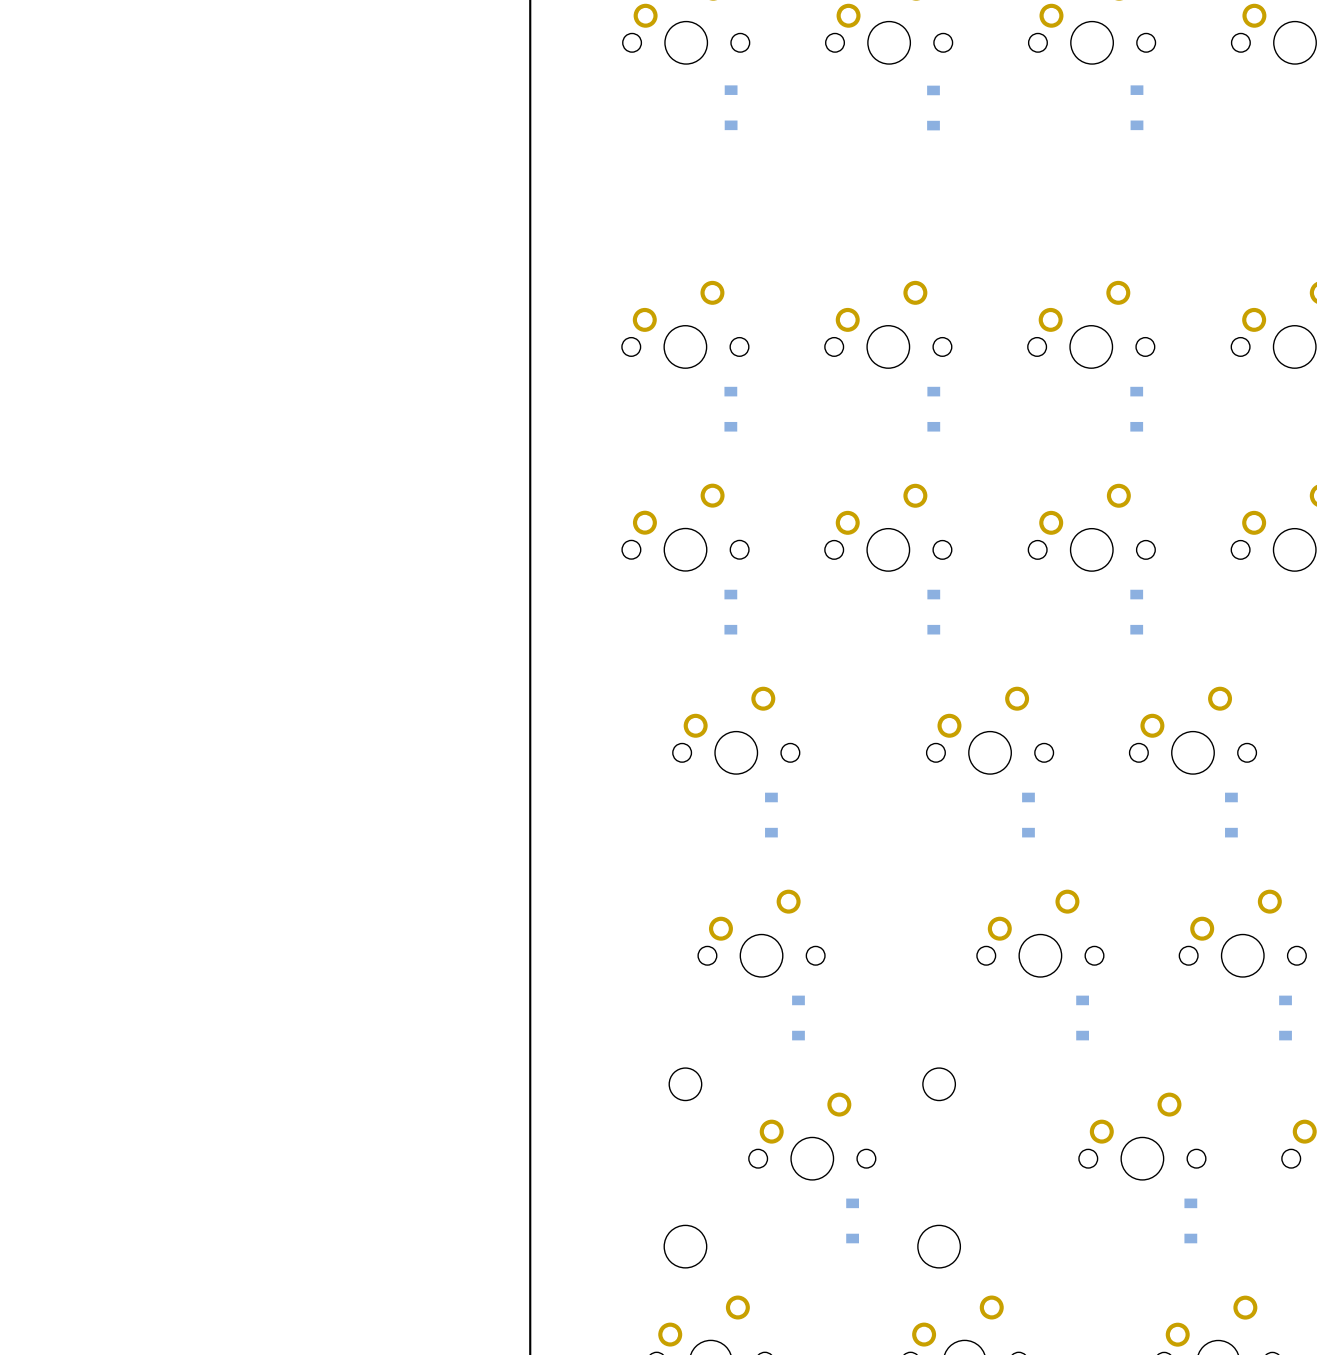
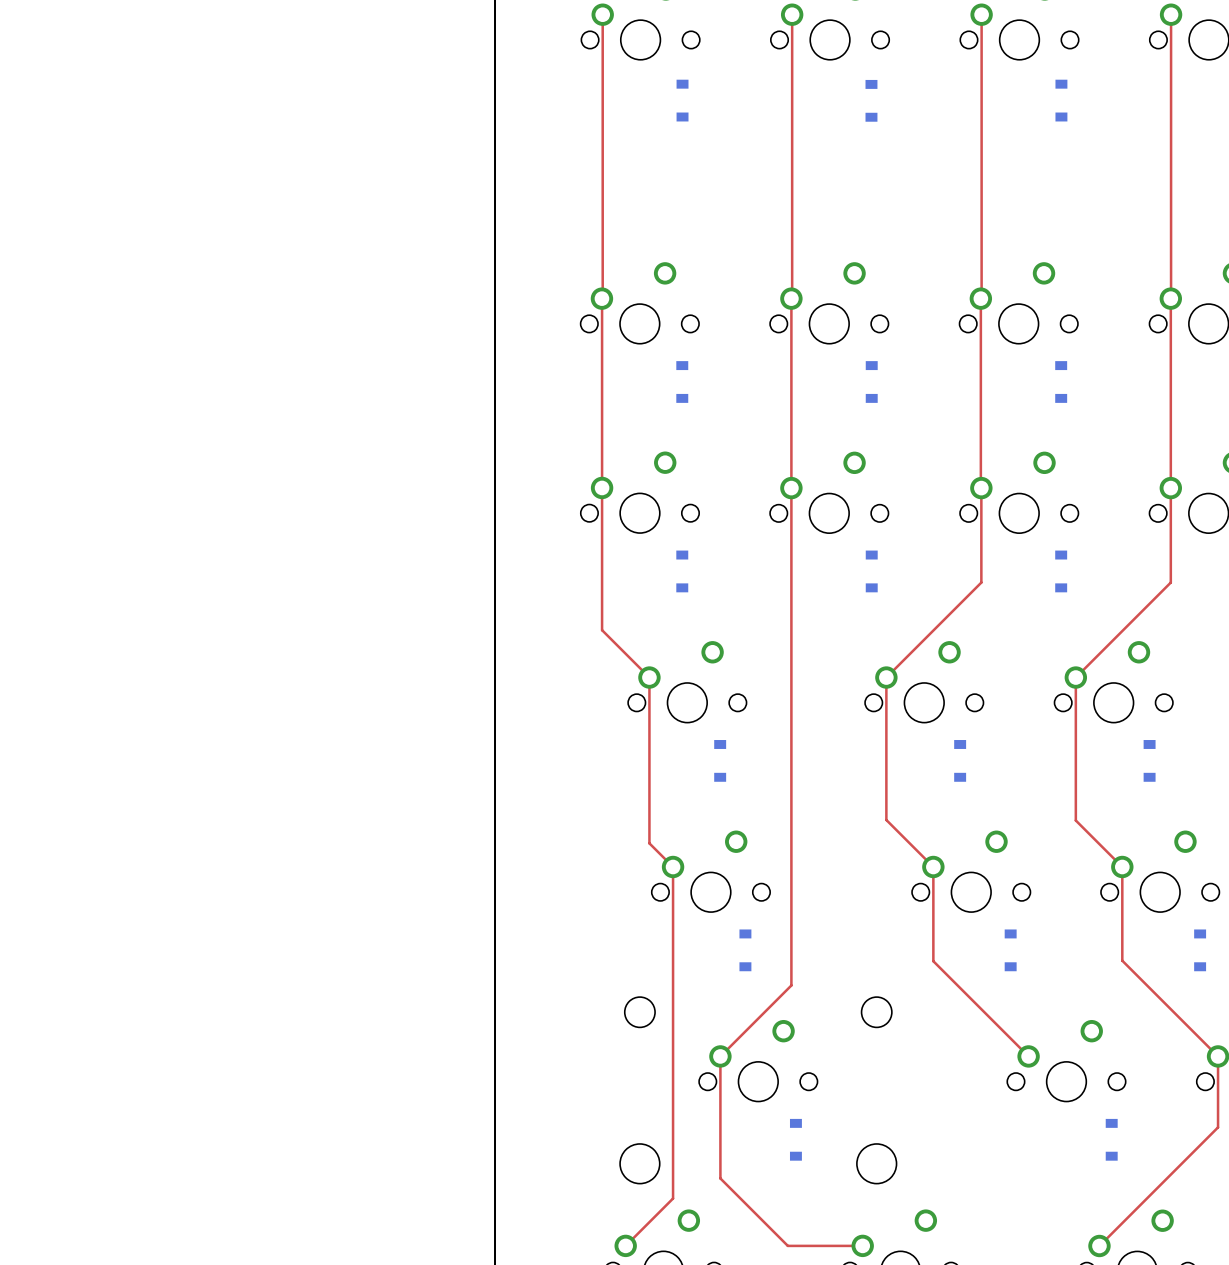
top track: none -> (602, 14) (601, 297)
top track: none -> (792, 14) (791, 985) (720, 1056) (720, 1178) (787, 1245) (862, 1245)
top track: none -> (981, 14) (981, 582) (886, 677) (886, 820) (933, 866) (933, 961) (1028, 1056)
top track: none -> (1171, 14) (1170, 582) (1075, 677) (1075, 820) (1122, 866) (1122, 960) (1218, 1056) (1218, 1127) (1099, 1245)
top track: none -> (602, 297) (602, 630) (649, 677) (649, 843) (673, 866) (673, 1198) (625, 1245)

